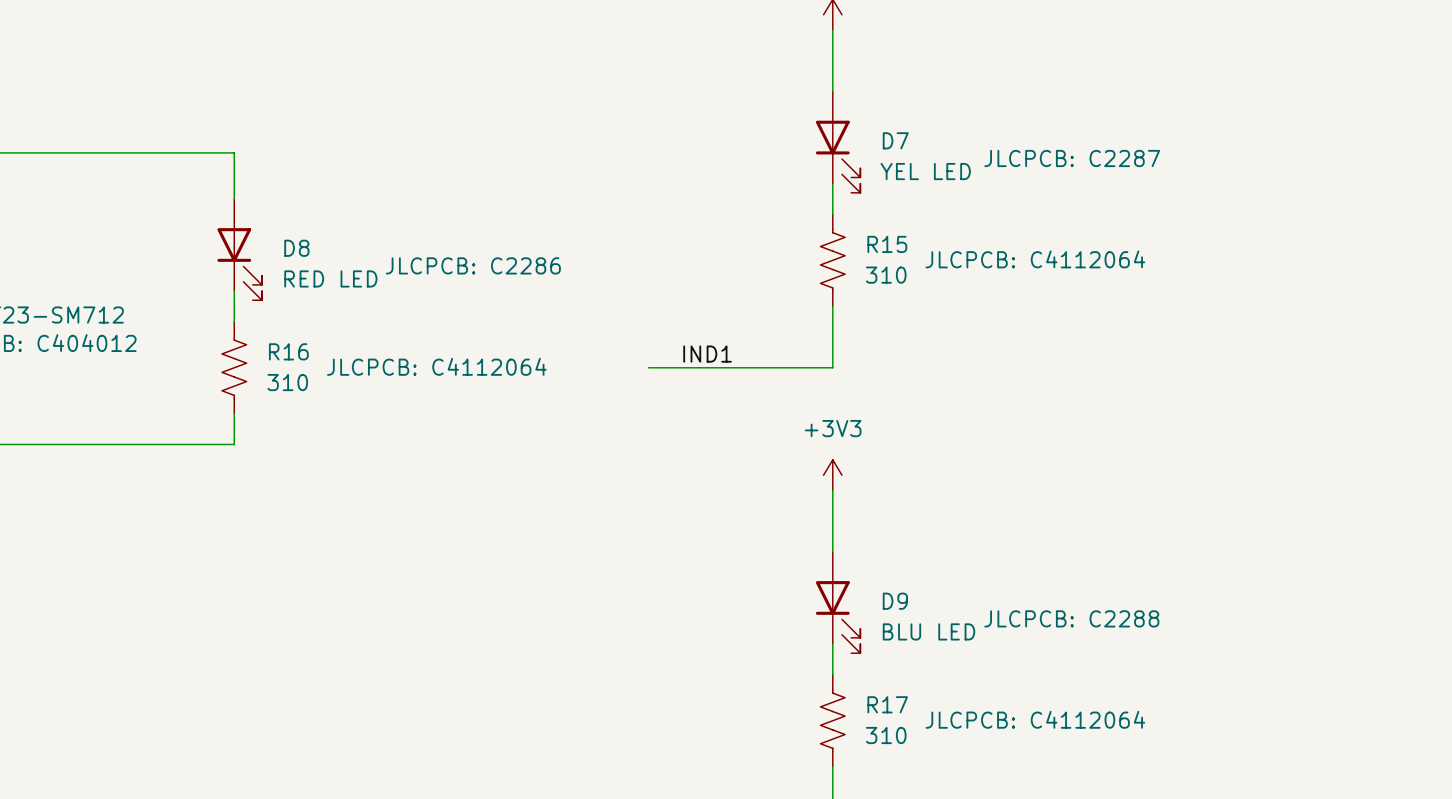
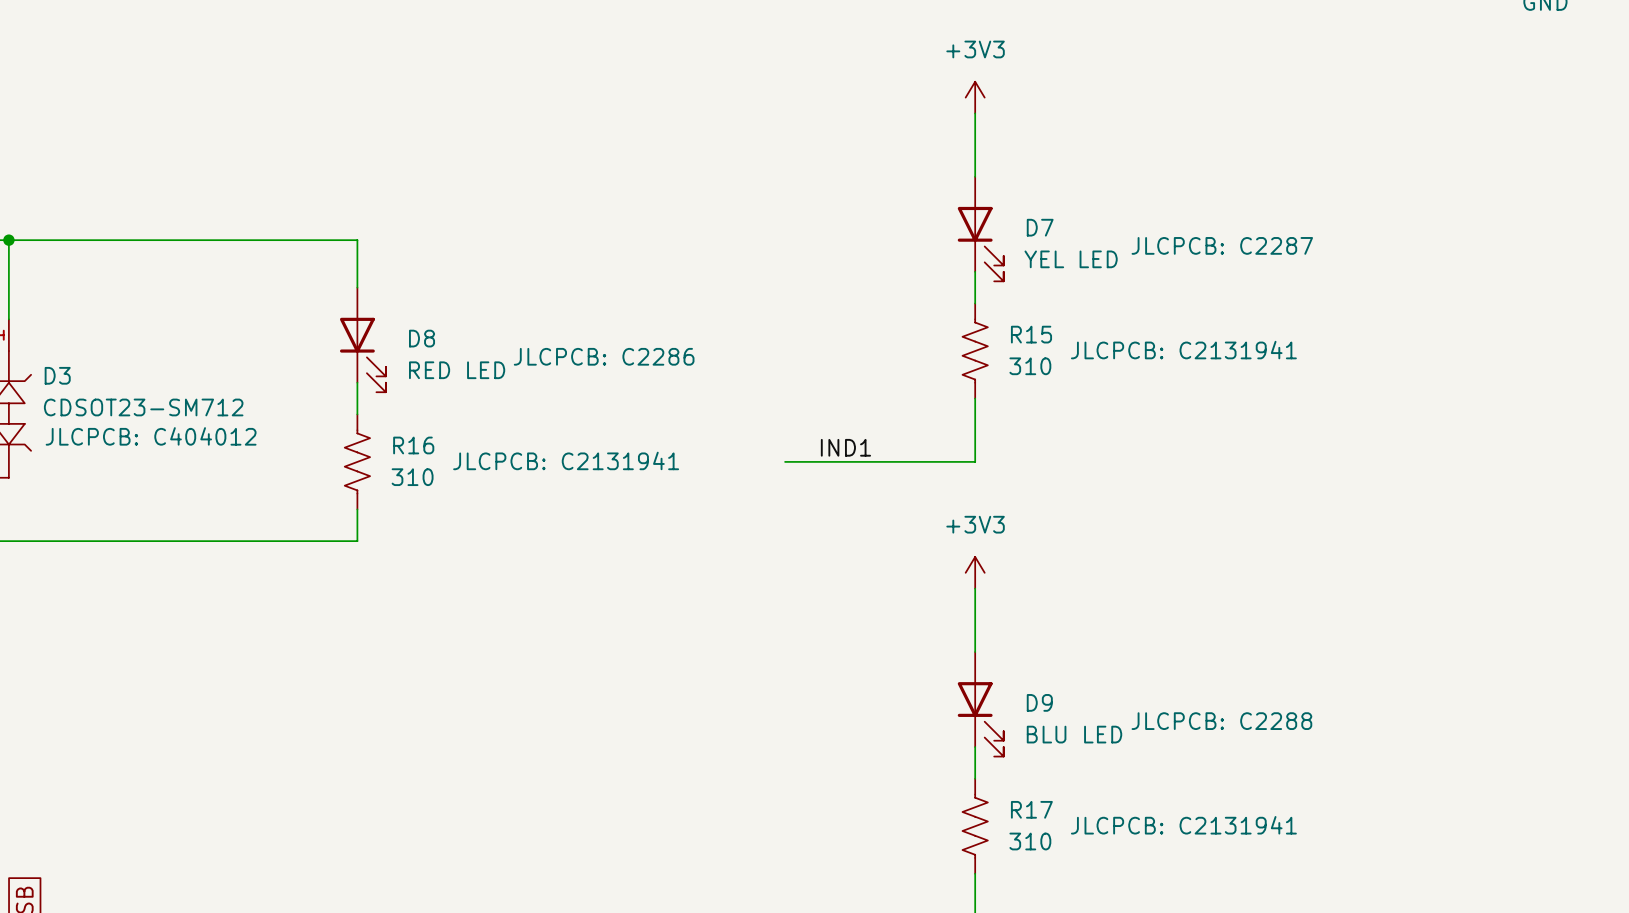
R15 text: JLCPCB: C4112064 (1035, 259) -> JLCPCB: C2131941 (1183, 350)
R16 text: JLCPCB: C4112064 (436, 366) -> JLCPCB: C2131941 (566, 460)
R17 text: JLCPCB: C4112064 (1035, 719) -> JLCPCB: C2131941 (1183, 825)

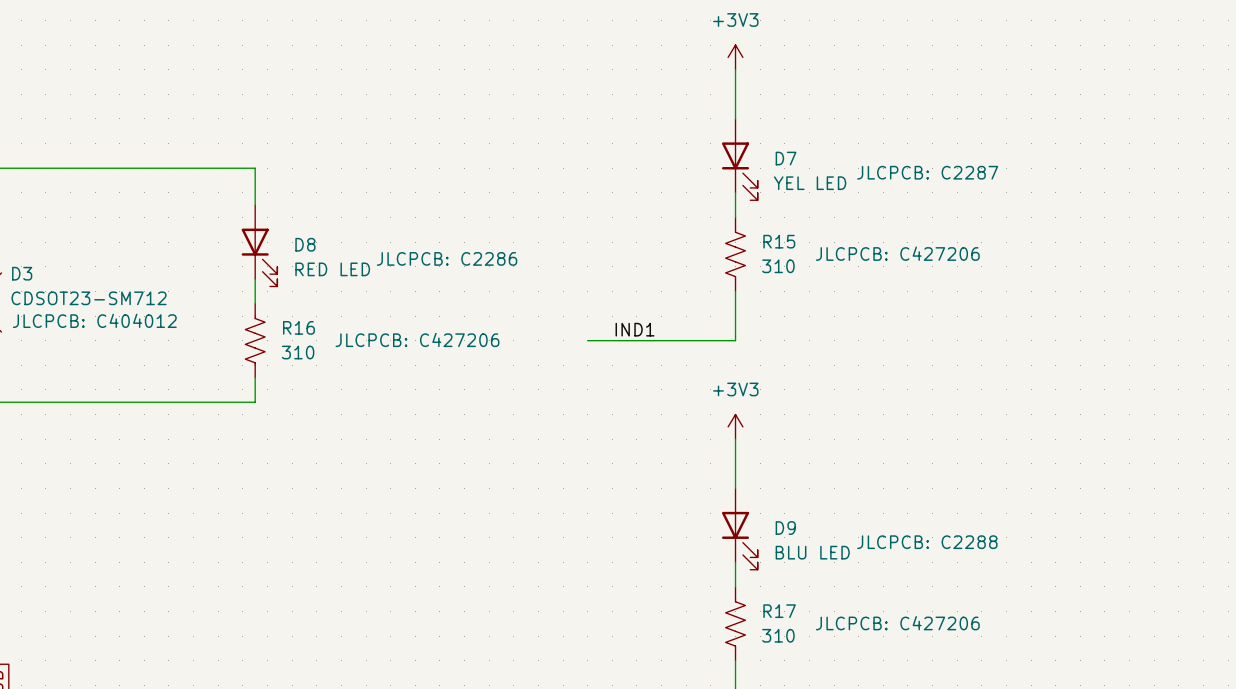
R15 text: JLCPCB: C2131941 (1183, 350) -> JLCPCB: C427206 (897, 253)
R16 text: JLCPCB: C2131941 (566, 460) -> JLCPCB: C427206 (417, 339)
R17 text: JLCPCB: C2131941 (1183, 825) -> JLCPCB: C427206 (897, 623)

